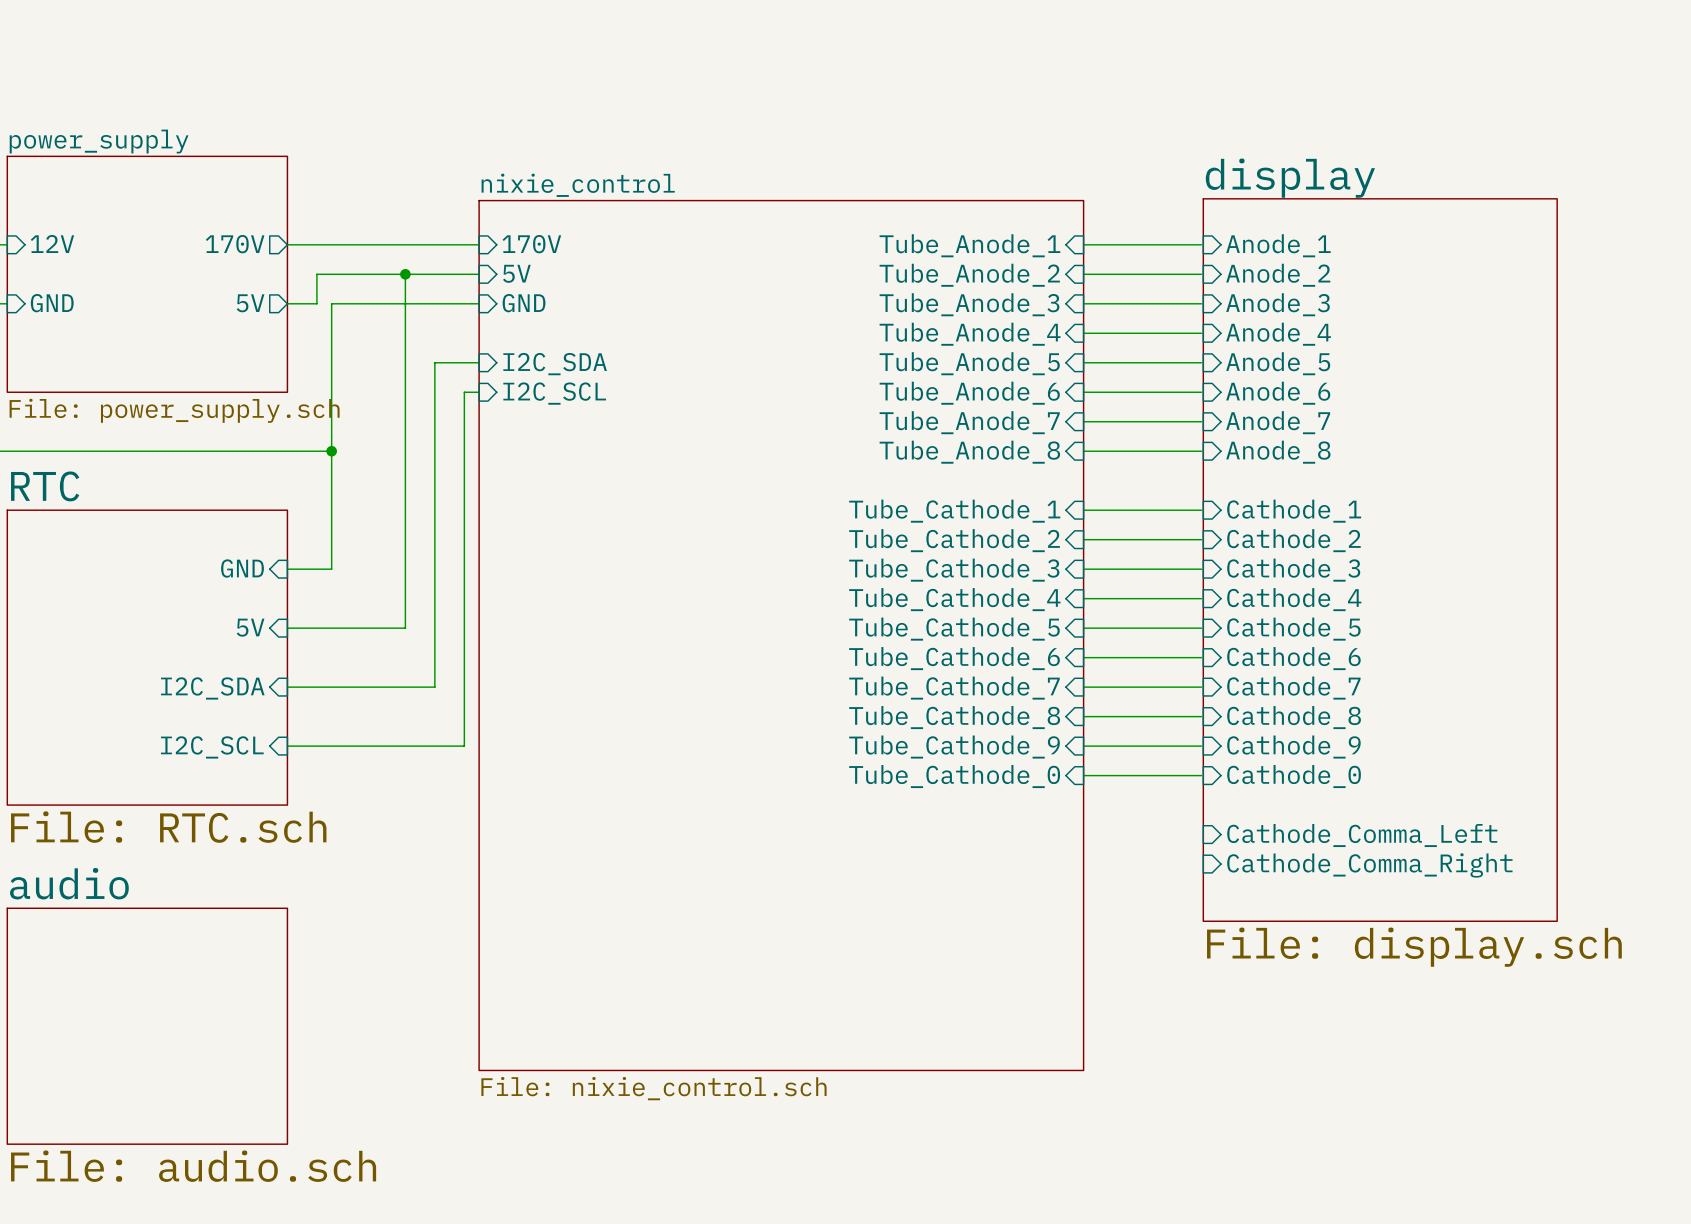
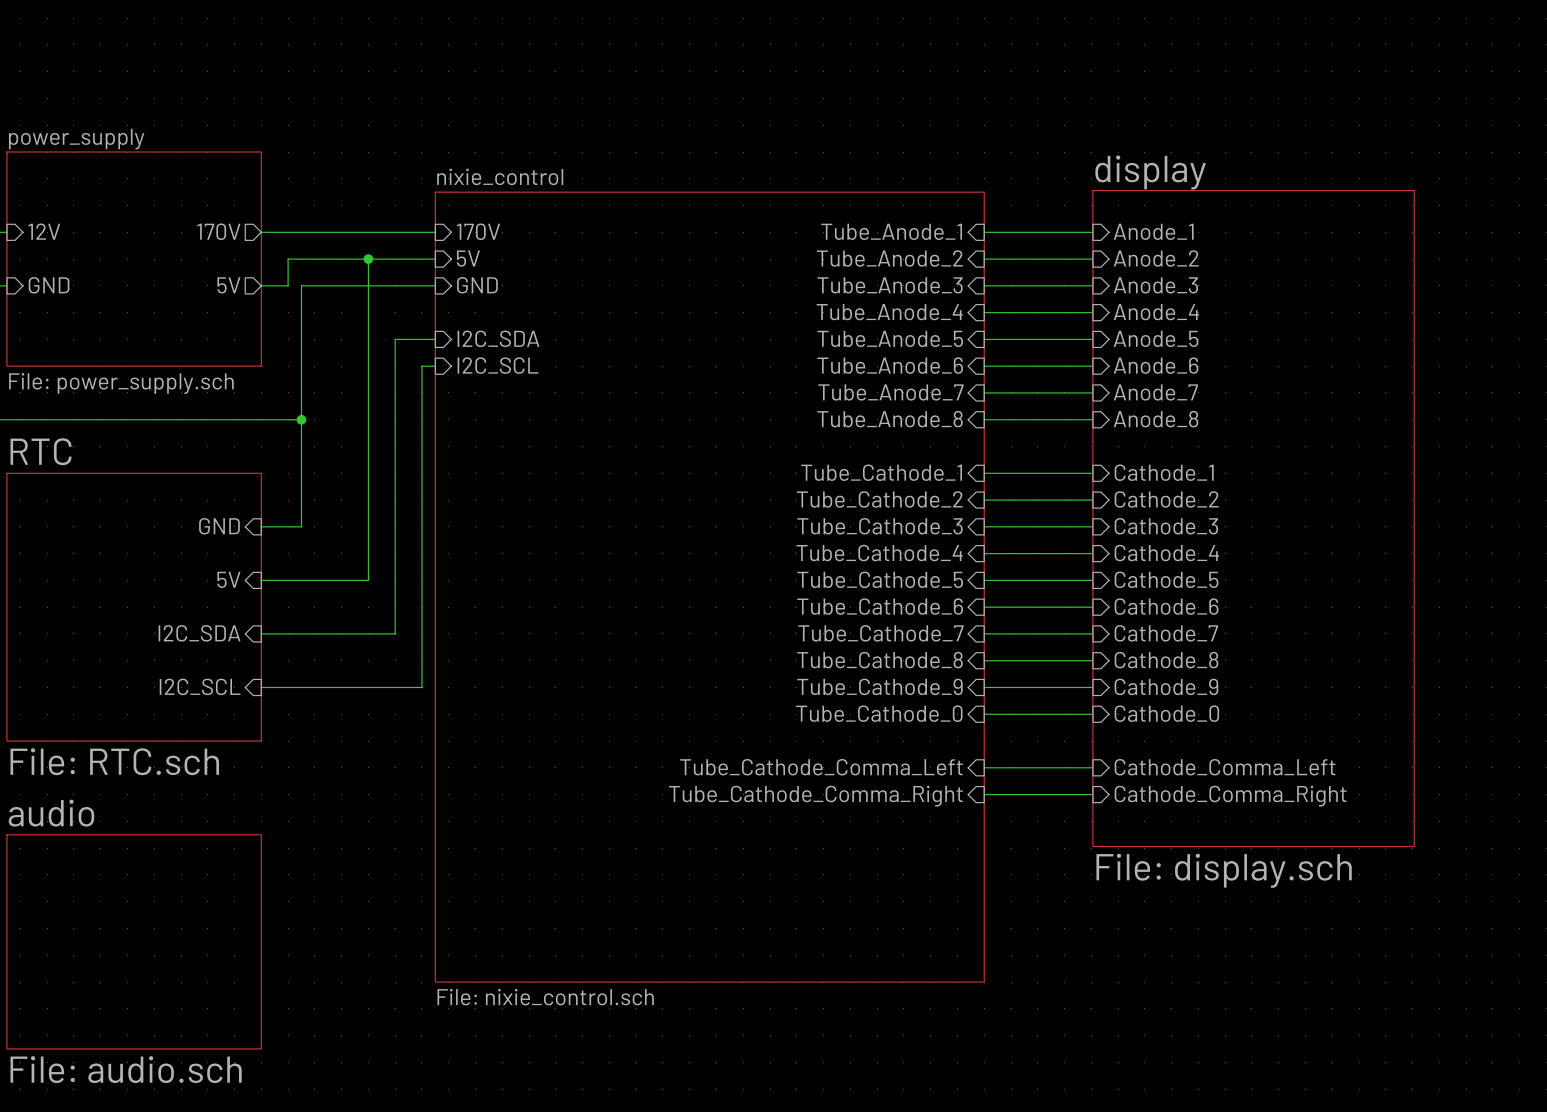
wire: none -> (984, 767) (1091, 767)
sheet pin: none -> Tube_Cathode_Comma_Left (821, 767)
wire: none -> (984, 794) (1091, 794)
sheet pin: none -> Tube_Cathode_Comma_Right (815, 796)

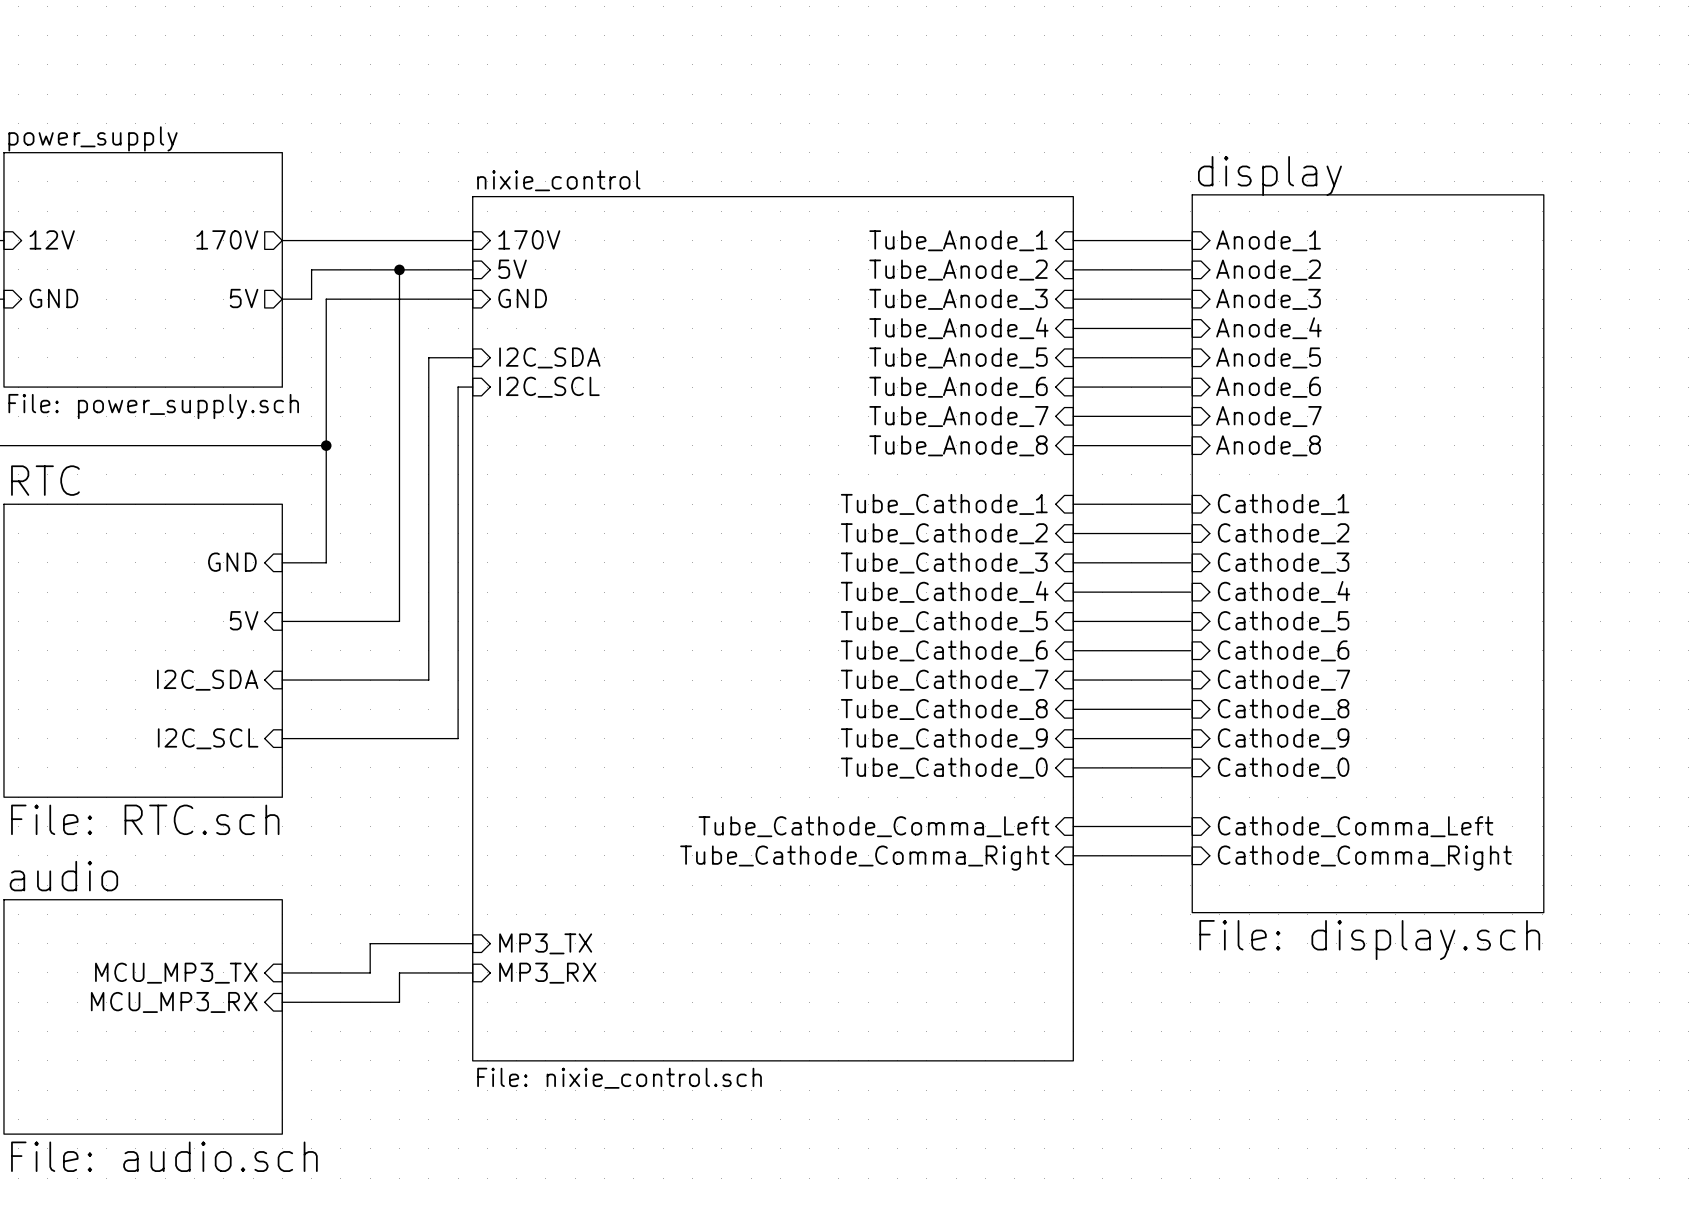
wire: none -> (472, 943) (370, 943) (370, 972) (282, 972)
sheet pin: none -> MP3_TX (545, 943)
sheet pin: none -> MCU_MP3_TX (176, 973)
wire: none -> (472, 972) (399, 972) (399, 1002) (282, 1002)
sheet pin: none -> MP3_RX (547, 973)
sheet pin: none -> MCU_MP3_RX (174, 1002)

